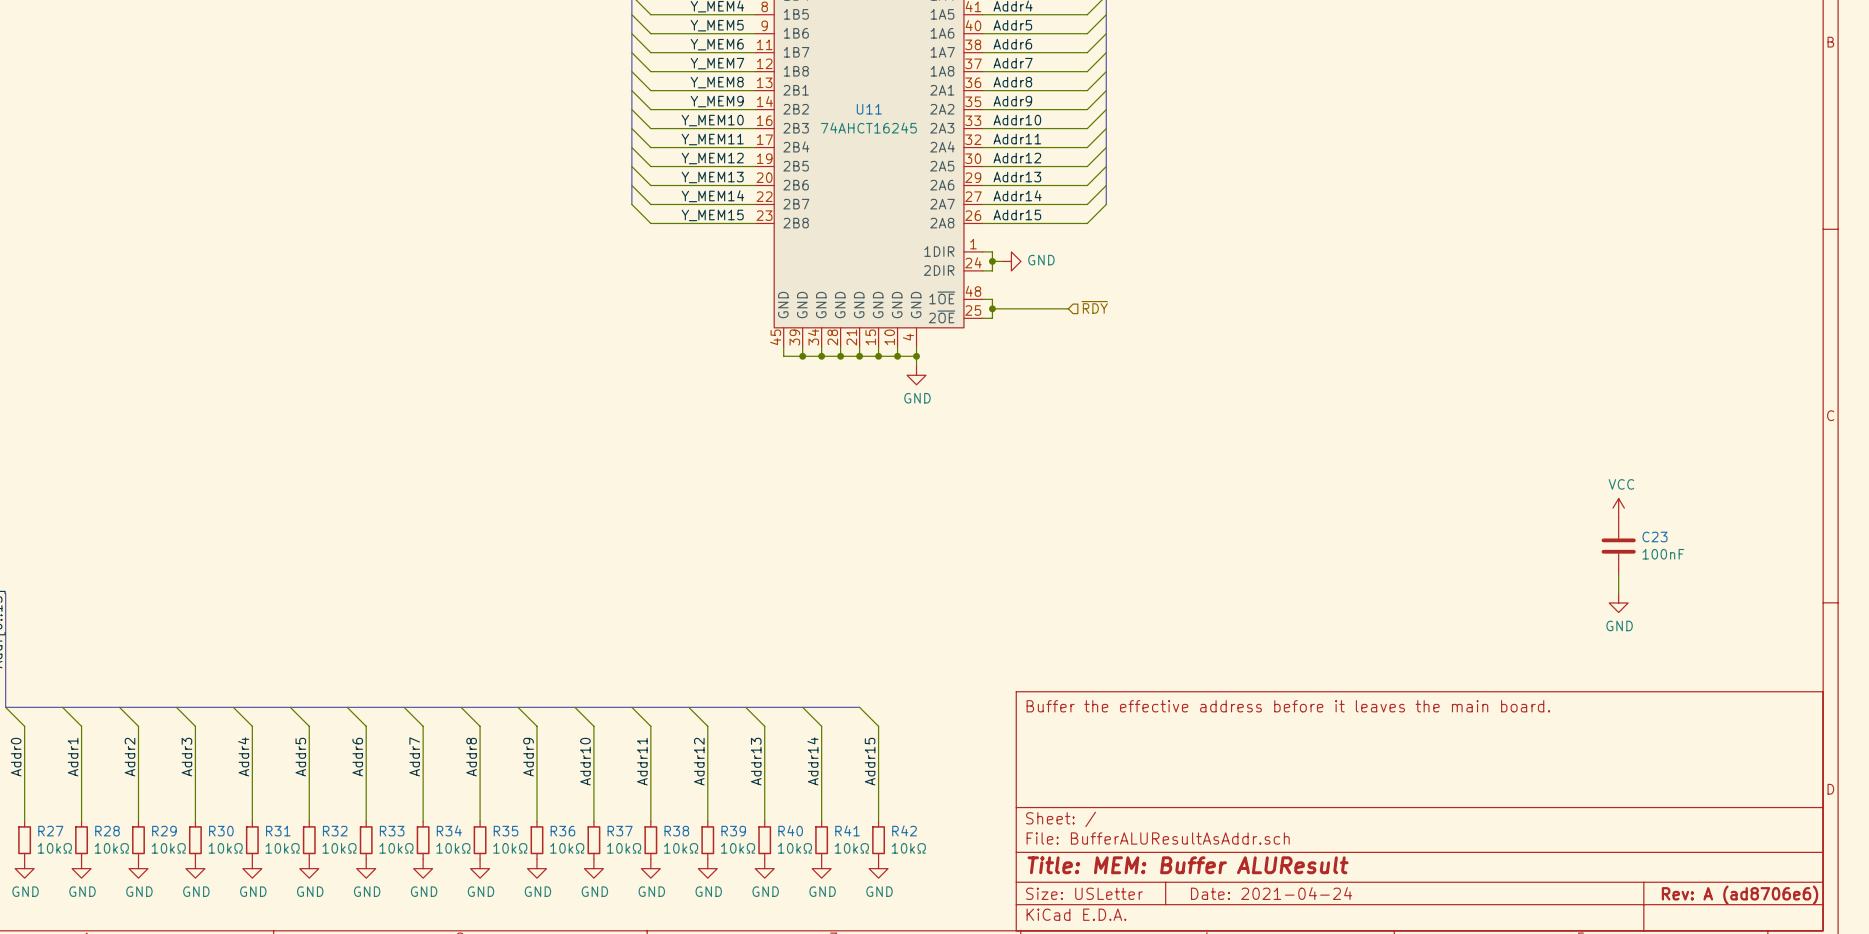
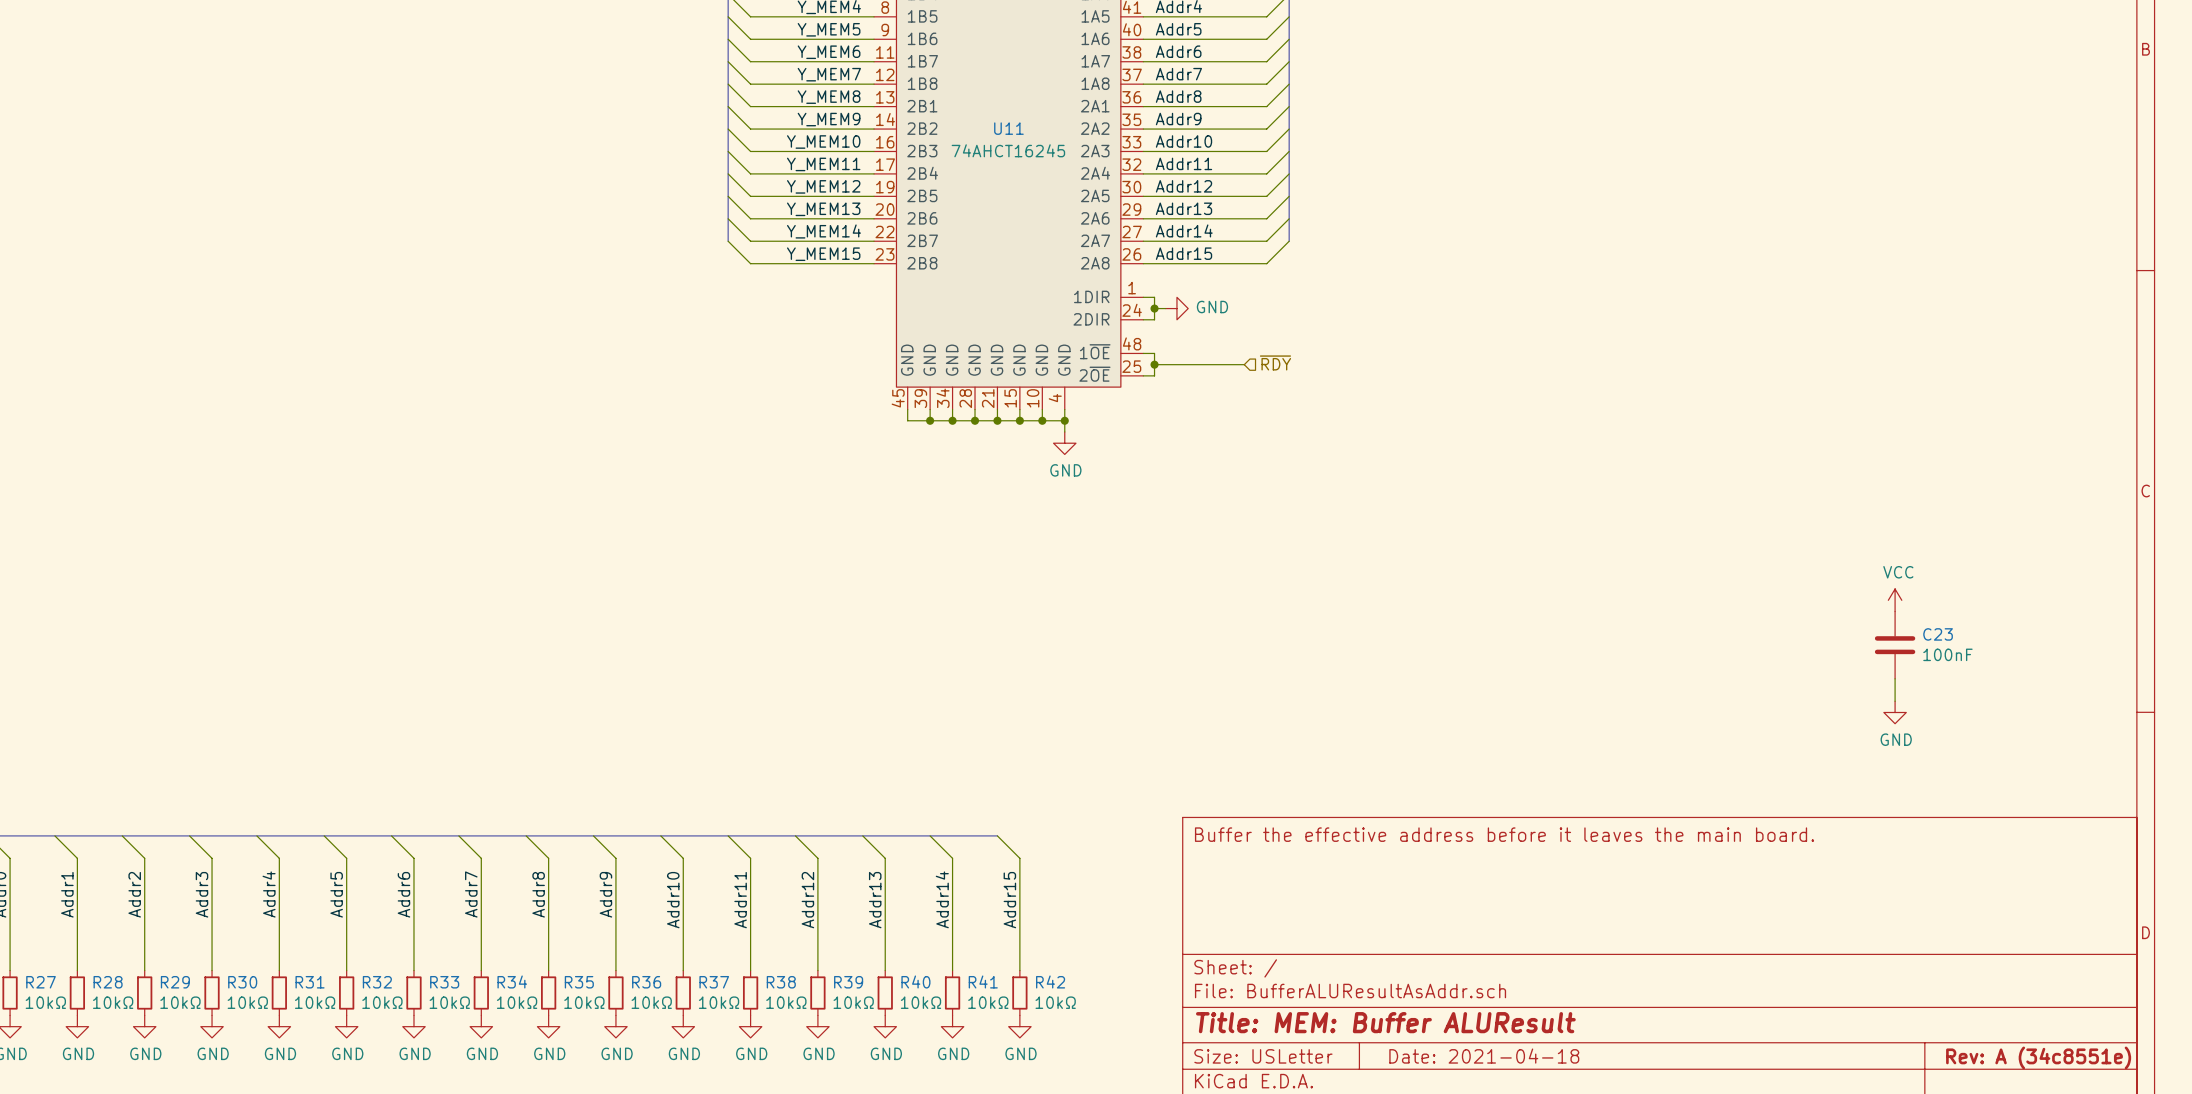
title block: Date: 2021-04-24 (1271, 893) -> Date: 2021-04-18 (1484, 1056)
title block: Rev: A (ad8706e6) (1740, 895) -> Rev: A (34c8551e) (2038, 1057)

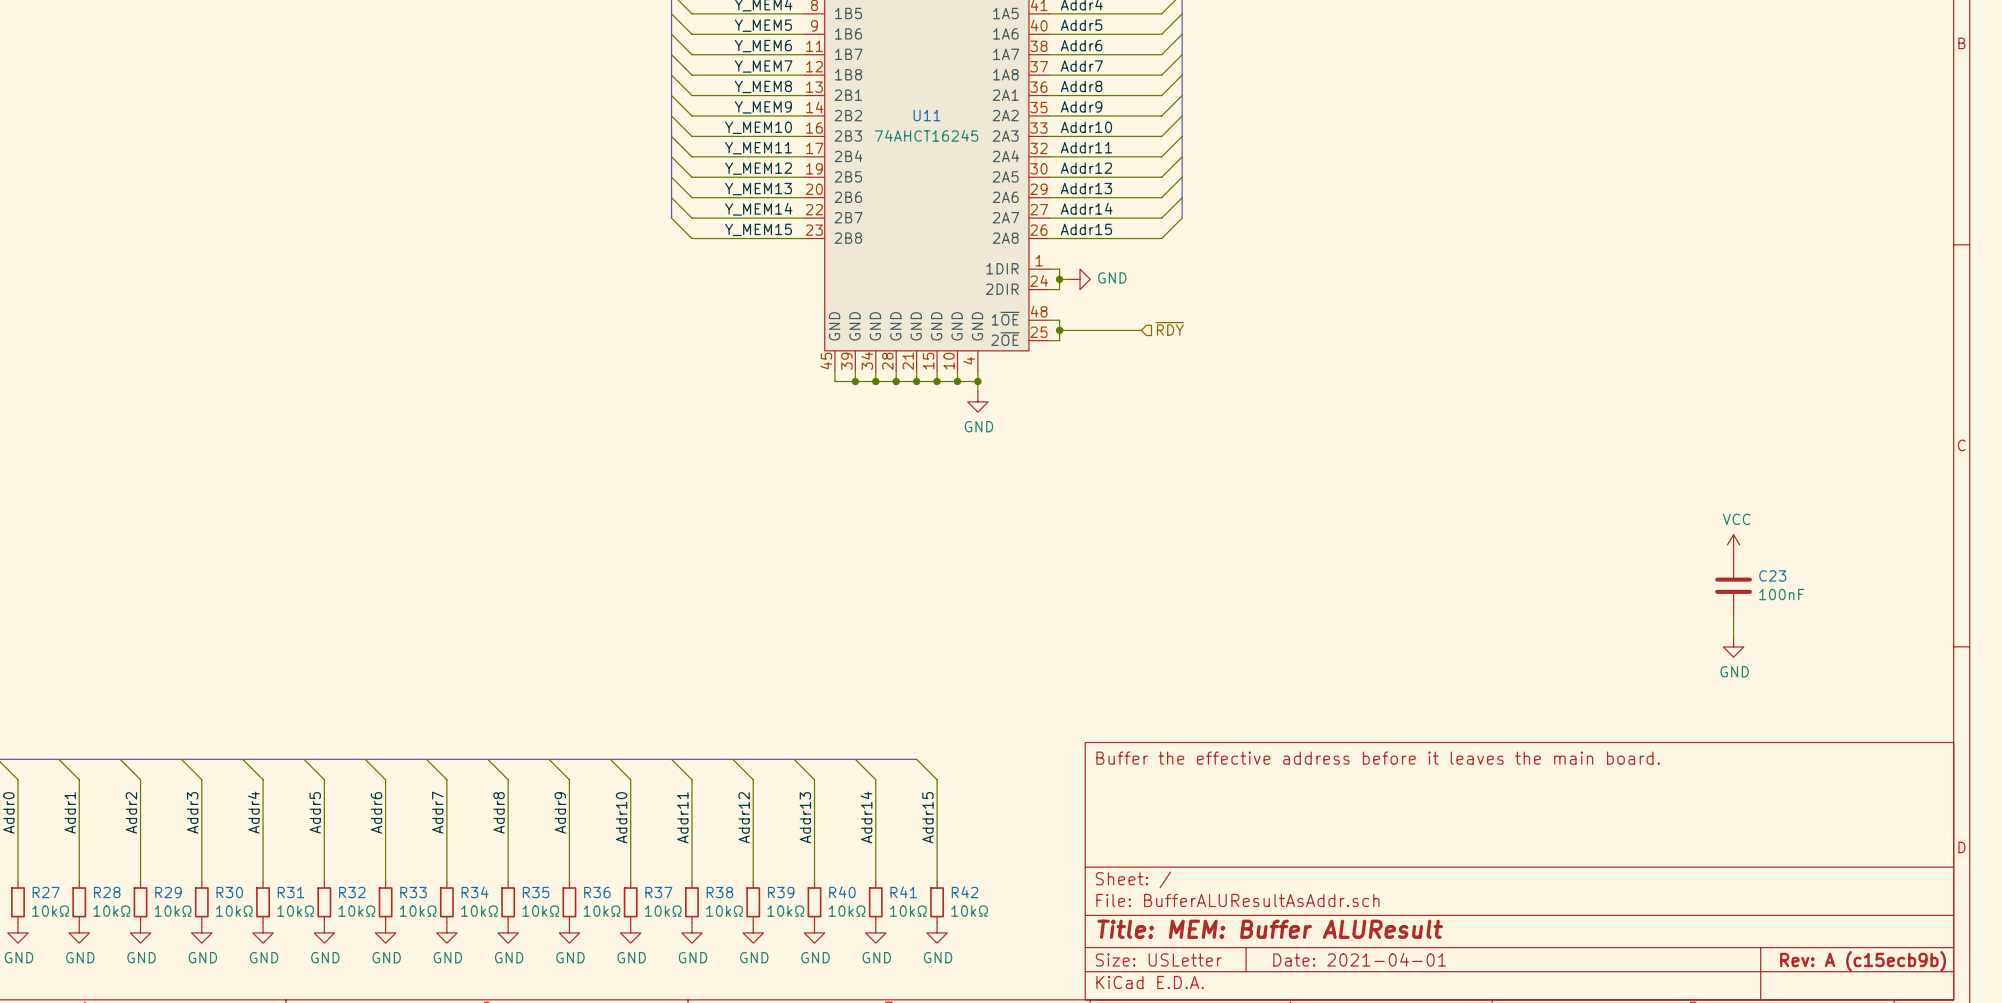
title block: Date: 2021-04-18 (1484, 1056) -> Date: 2021-04-01 (1359, 959)
title block: Rev: A (34c8551e) (2038, 1057) -> Rev: A (c15ecb9b) (1863, 961)

